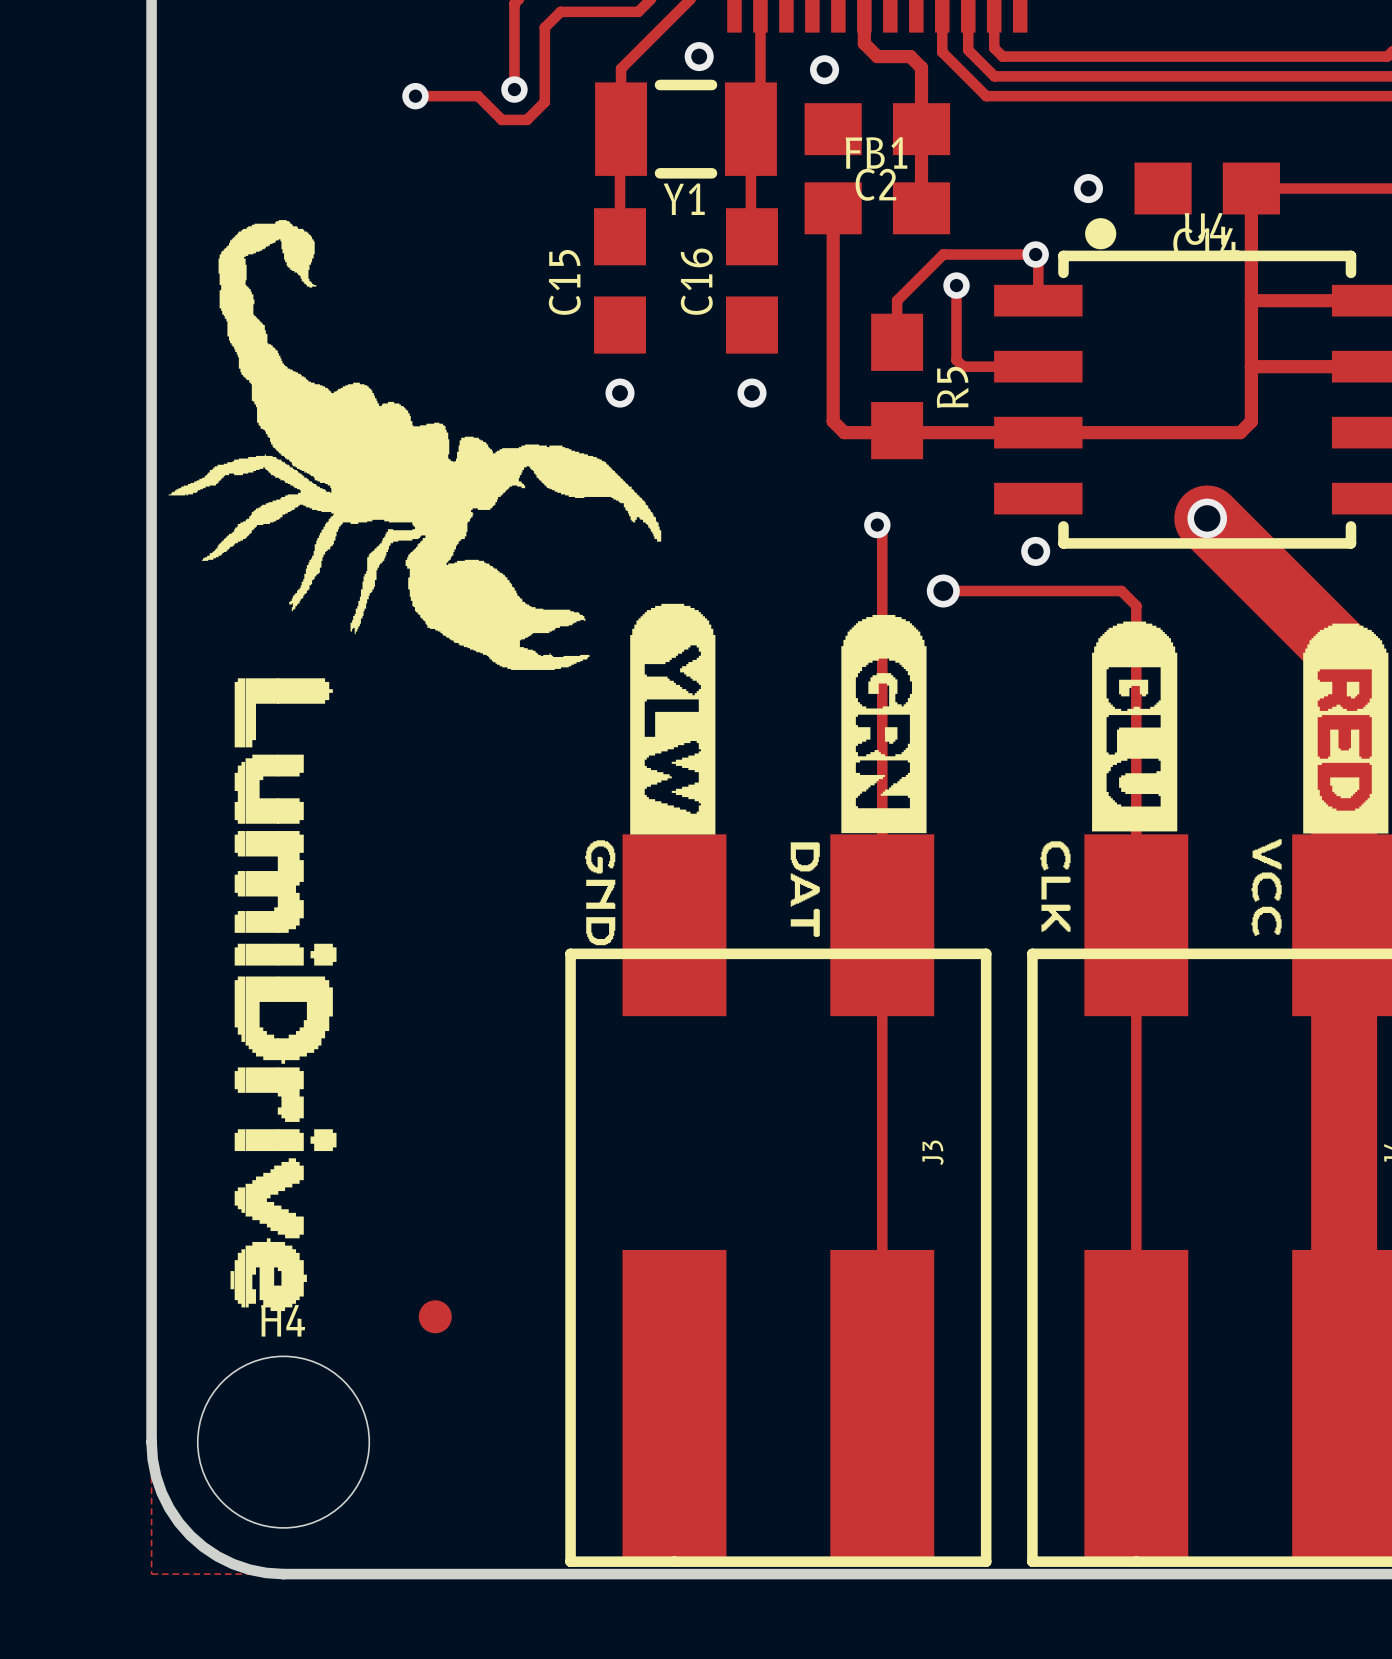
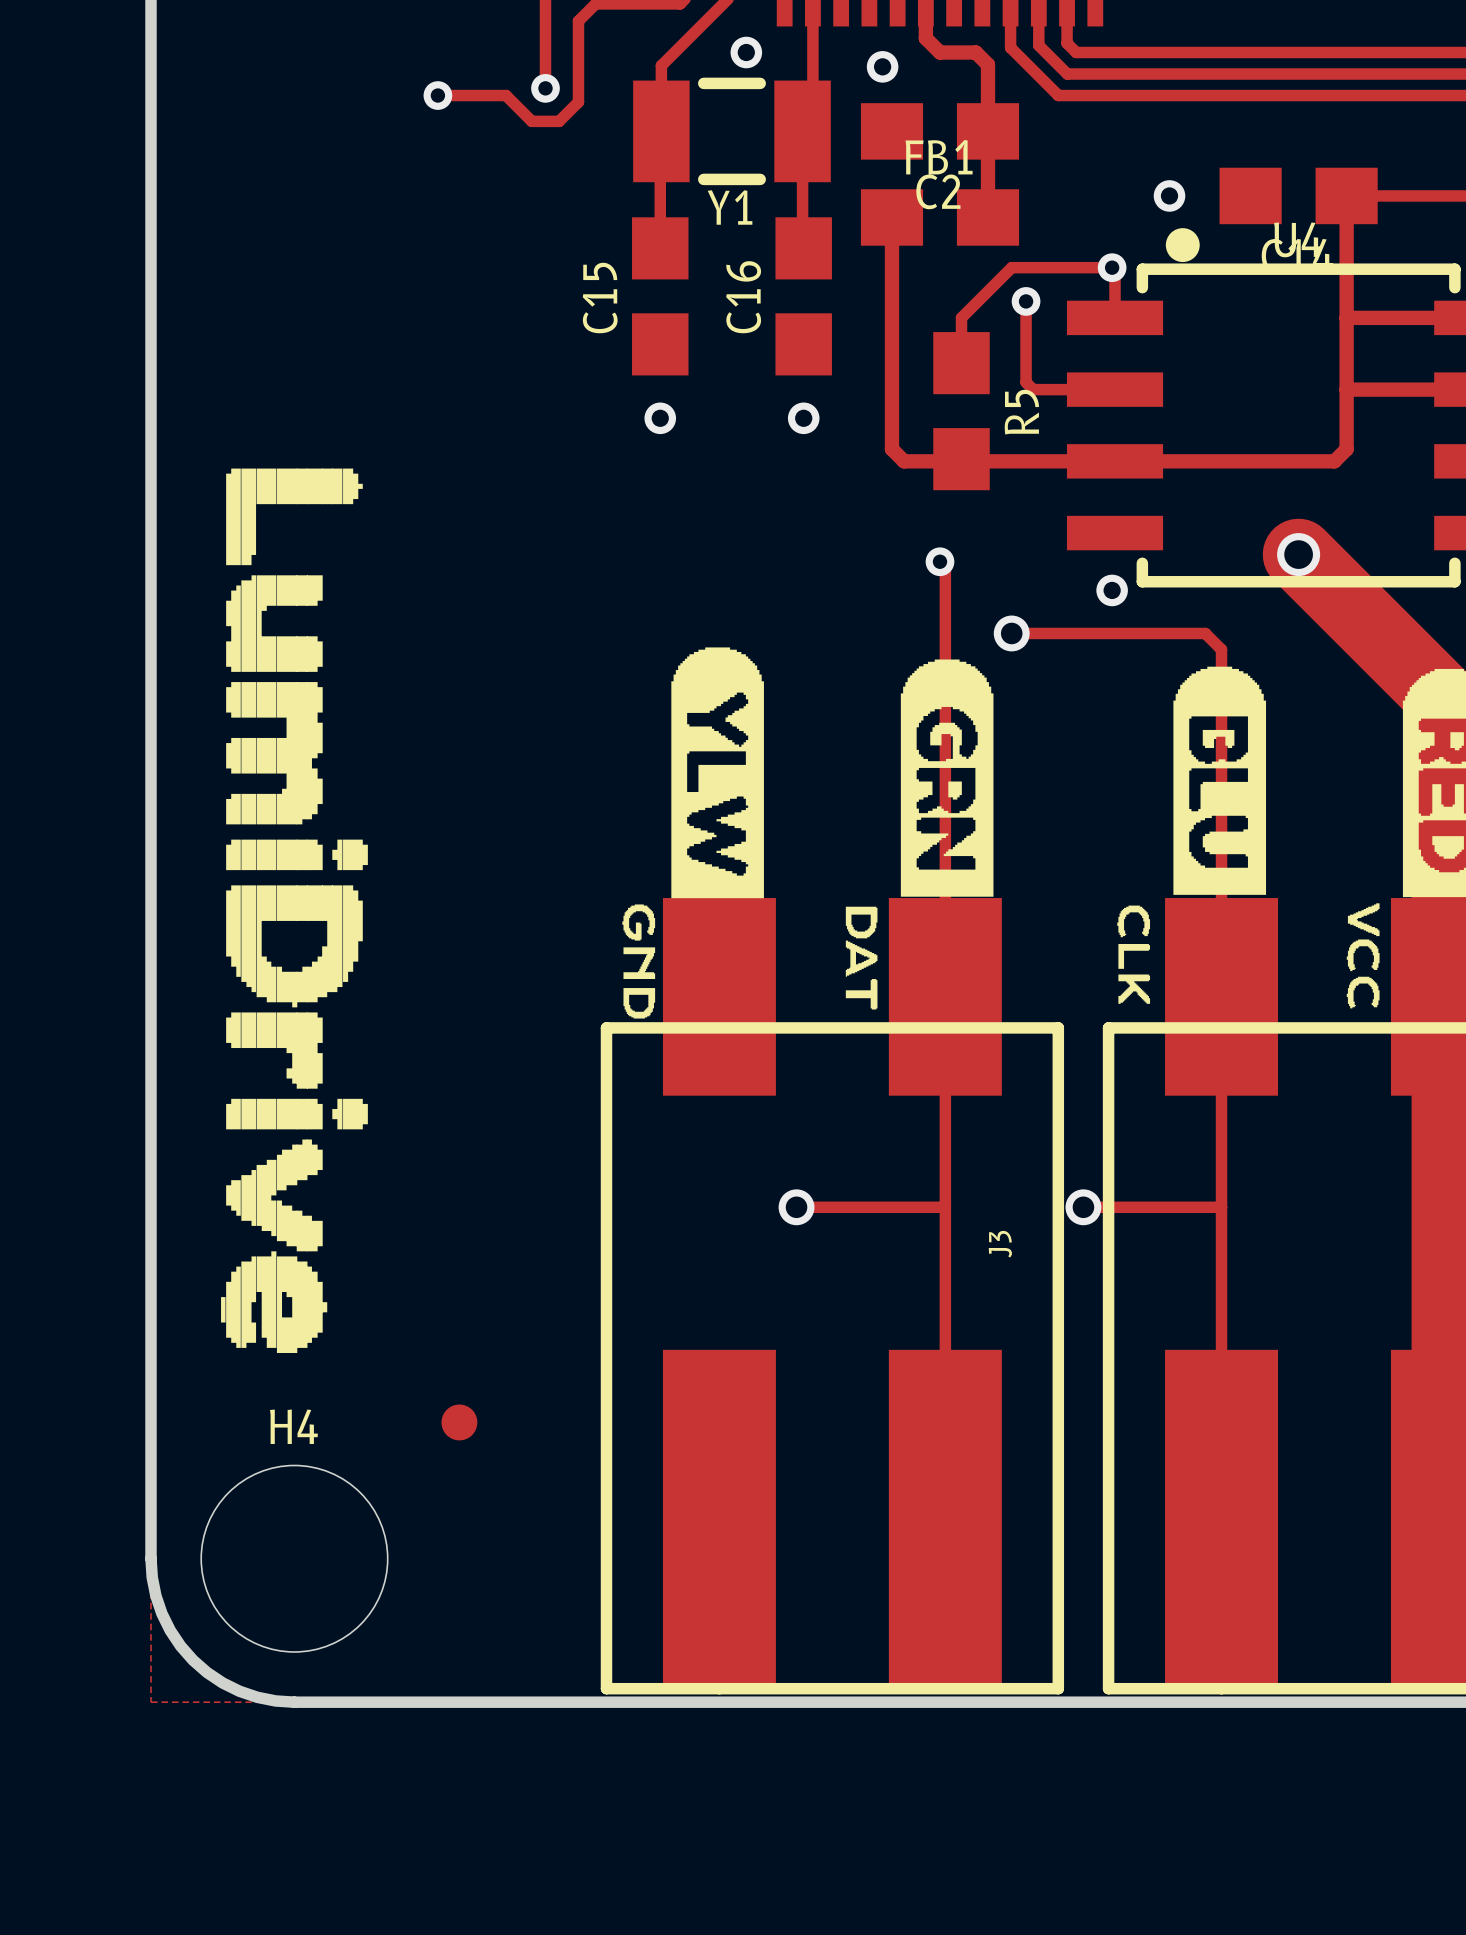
drawing: [168, 220, 662, 1312] -> none
drawing: none -> [221, 468, 368, 1354]
track: none -> (796, 1207) (945, 1207)
via: none -> (796, 1207)
track: none -> (1083, 1207) (1221, 1207)
via: none -> (1083, 1207)

